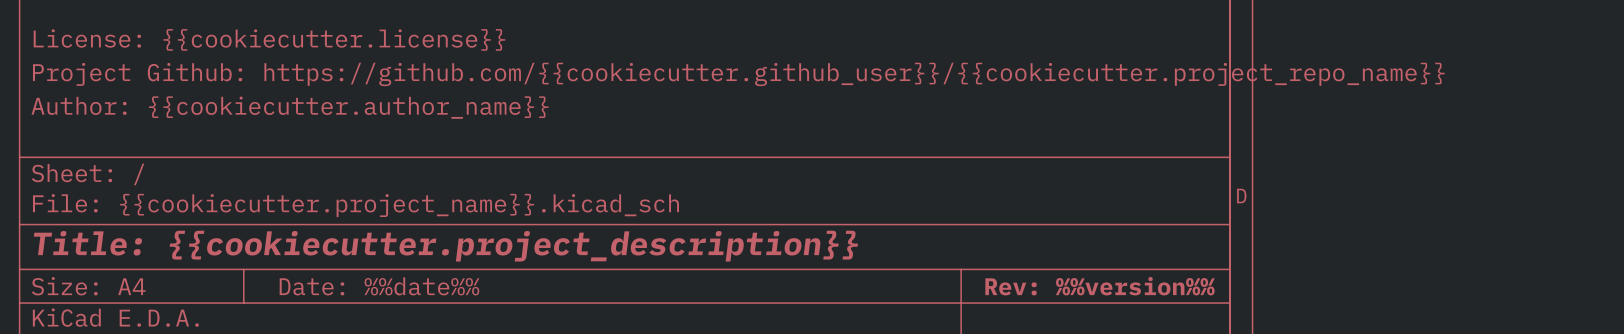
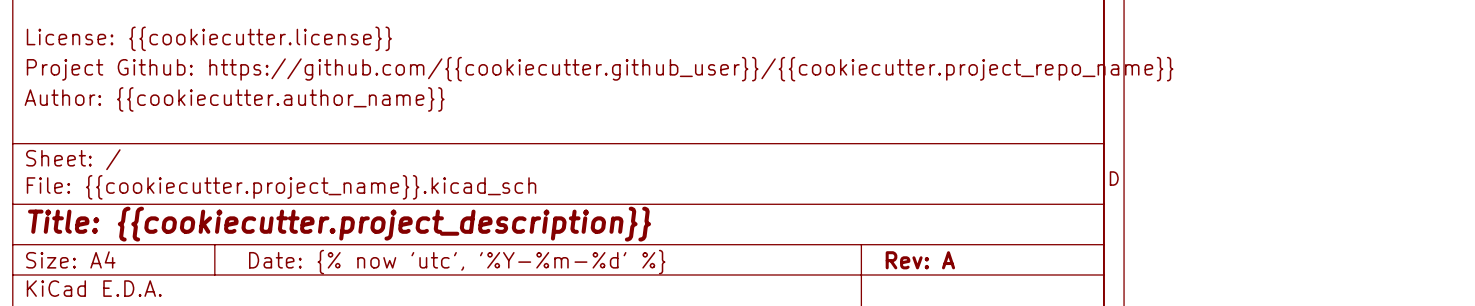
title block: Date: %%date%% (379, 286) -> Date: {% now 'utc', '%Y-%m-%d' %} (457, 262)
title block: Rev: %%version%% (1100, 286) -> Rev: A (920, 260)

